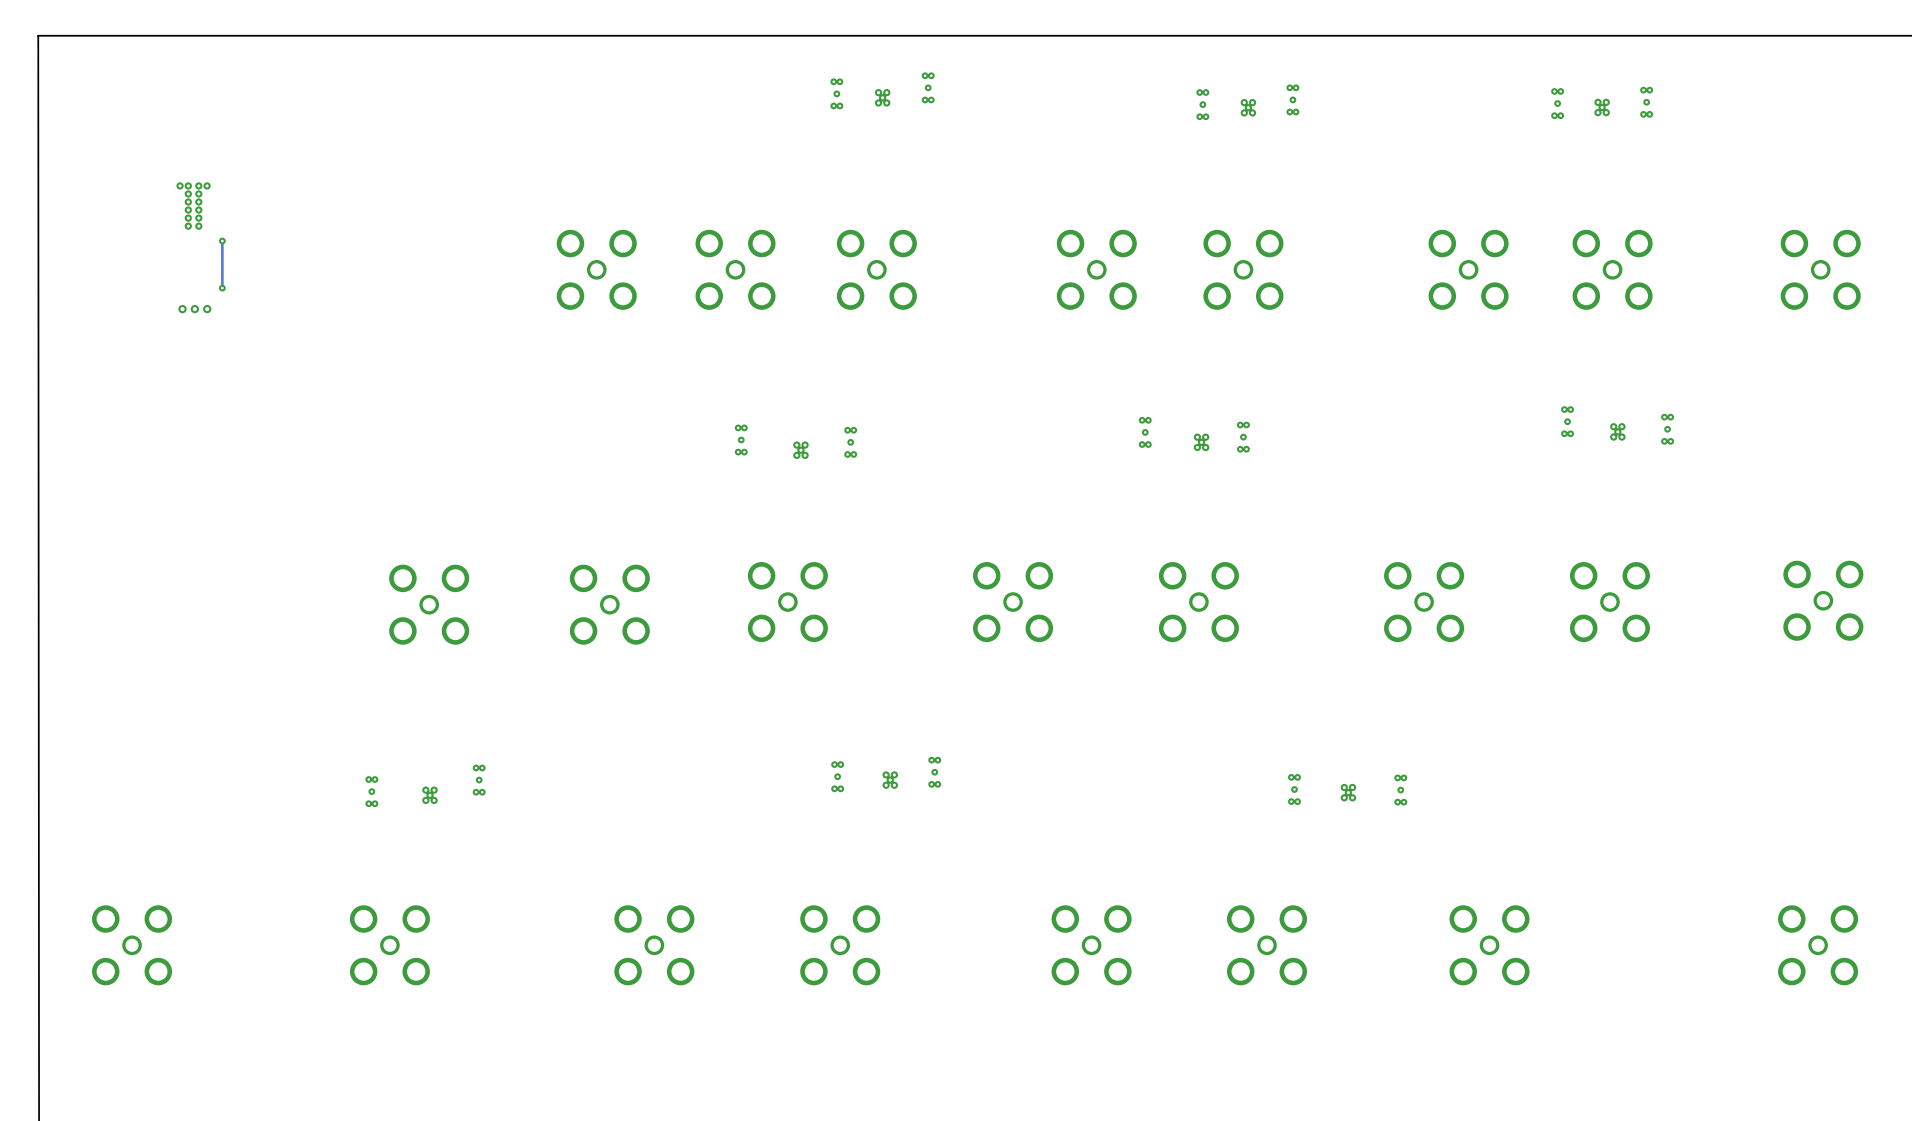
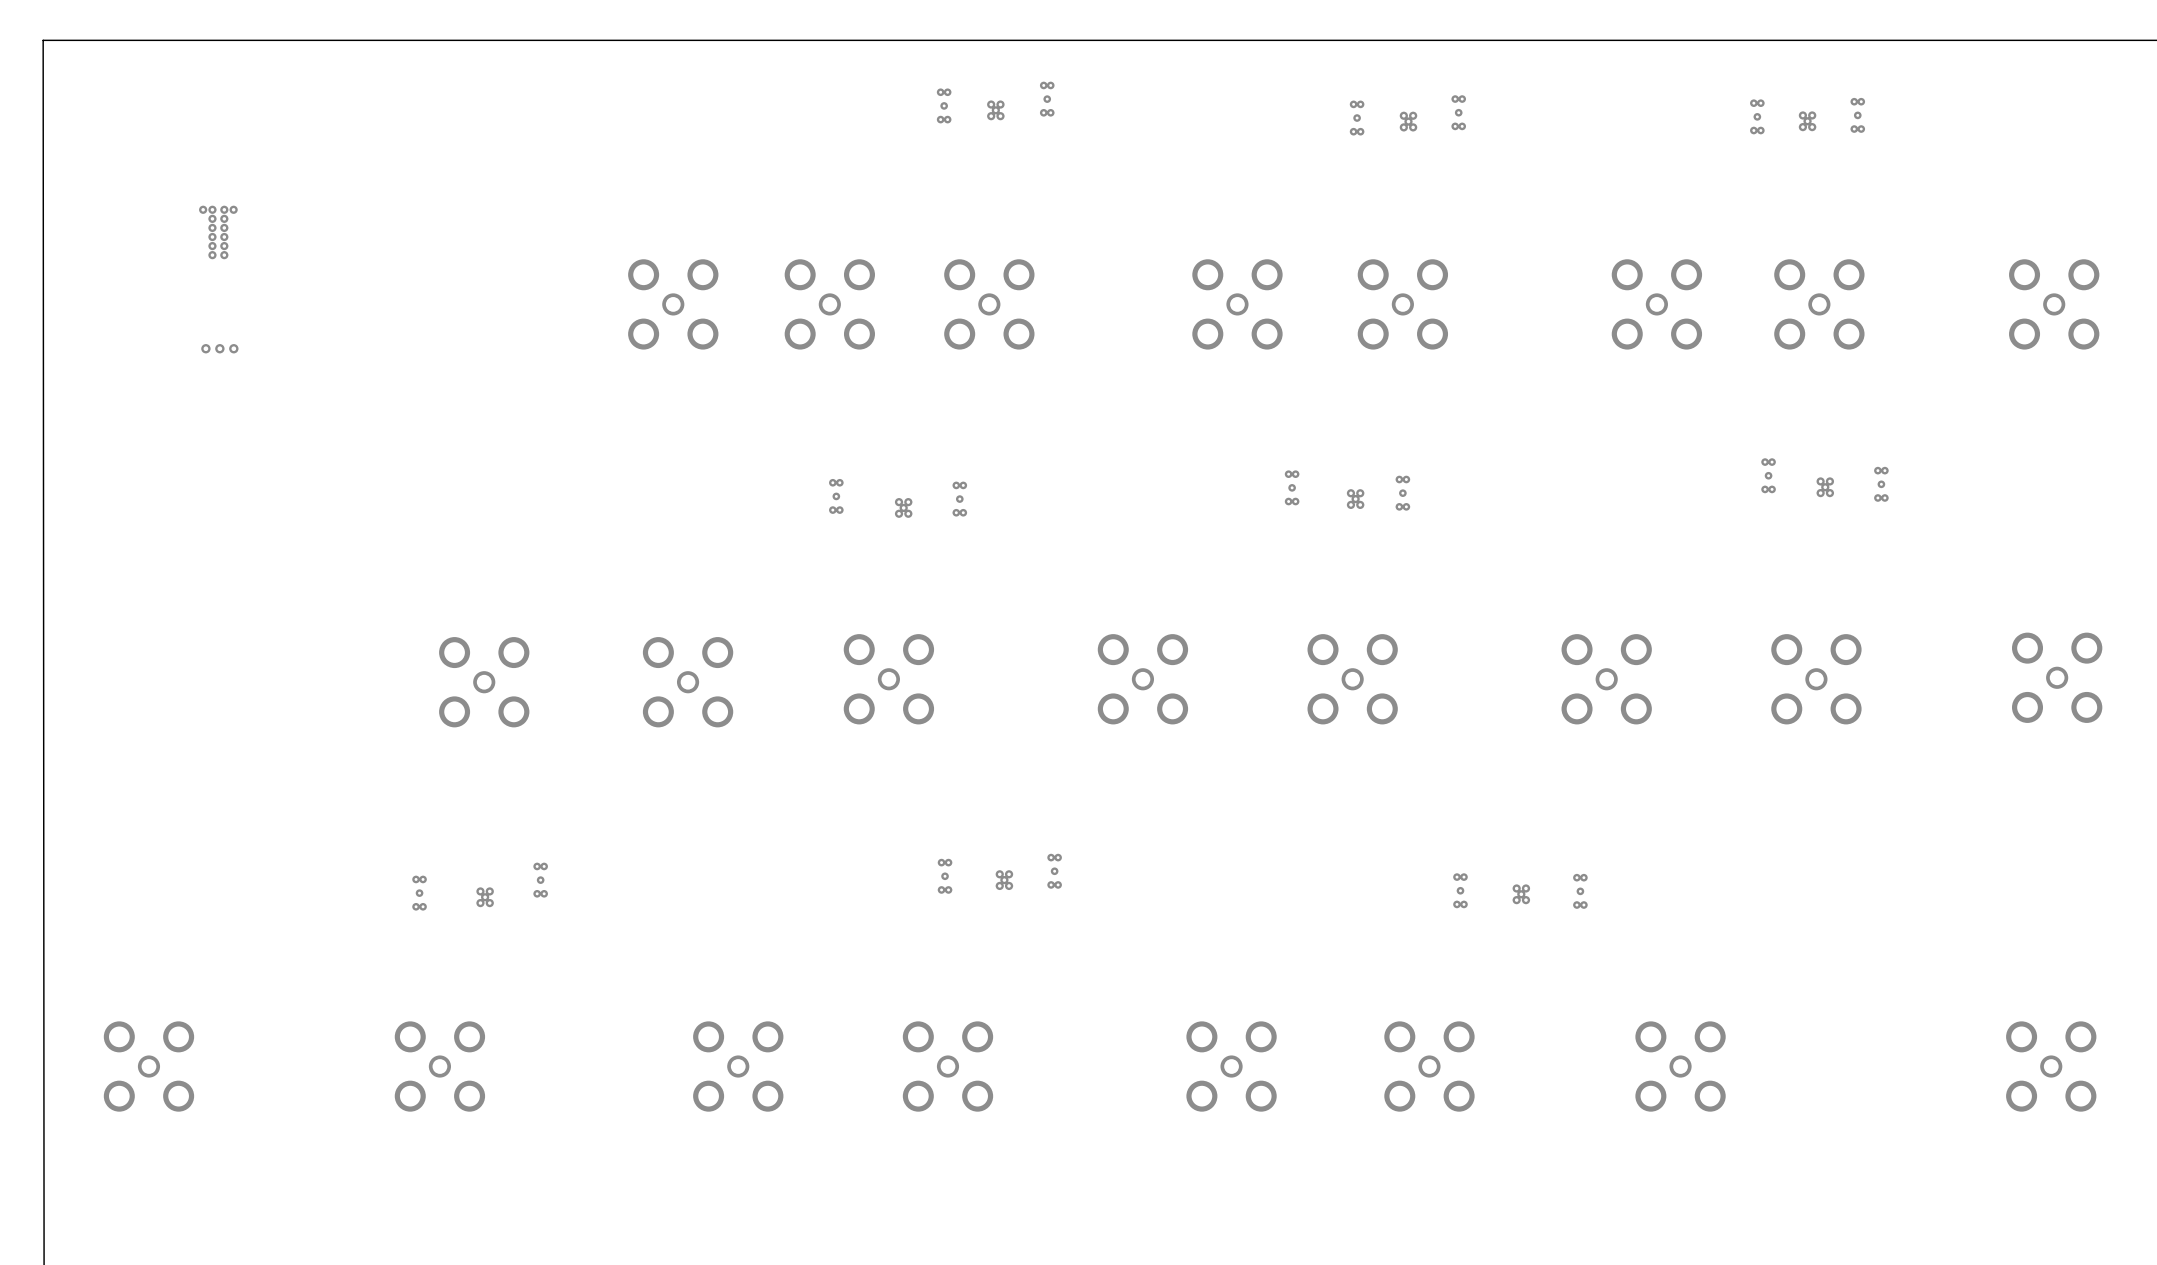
track: (222, 241) (222, 288) -> none
via: (222, 241) -> none
via: (222, 288) -> none

